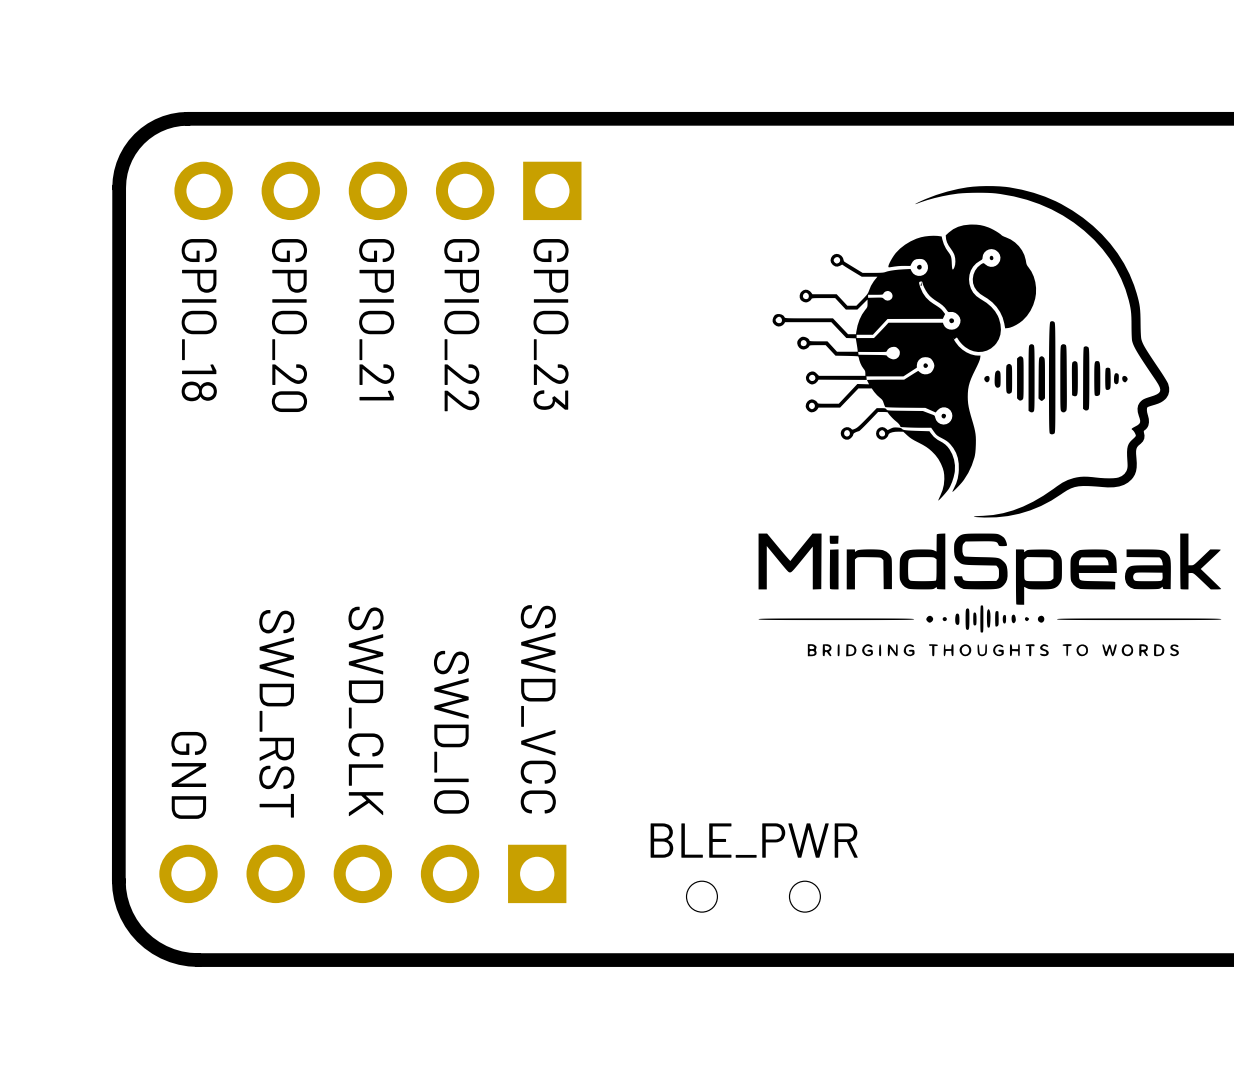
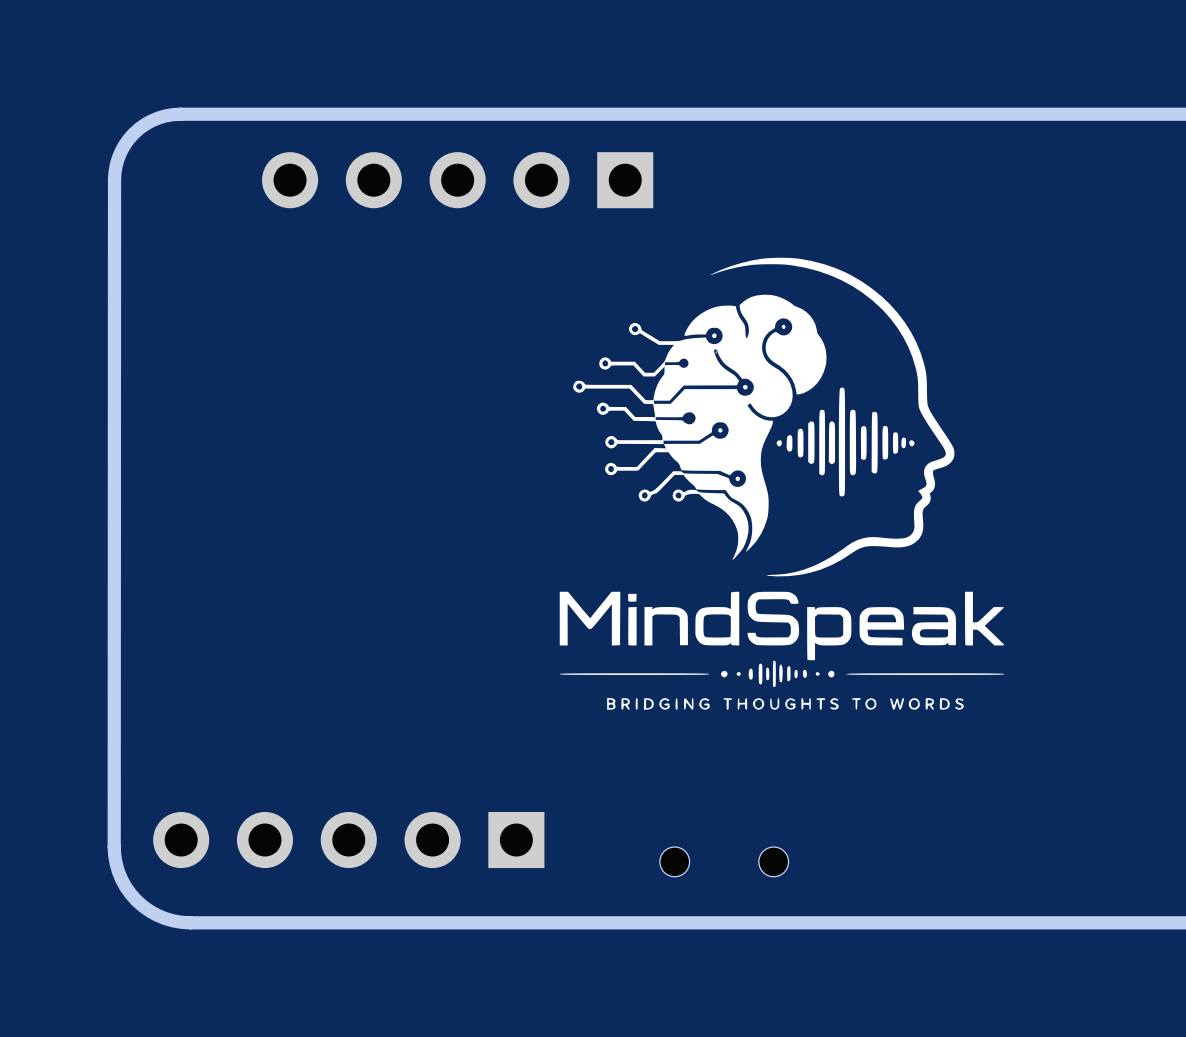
part position: (377, 190) -> (457, 180)
text: GPIO_21 (376, 319) -> none
text: GPIO_18 (199, 320) -> none
text: GPIO_23 (551, 324) -> none
text: GPIO_20 (289, 325) -> none
text: GPIO_22 (461, 325) -> none
drawing position: (989, 421) -> (782, 483)
text: SWD_VCC (538, 709) -> none
text: SWD_CLK (366, 711) -> none
text: SWD_RST (276, 713) -> none
text: SWD_IO (451, 732) -> none
text: GND (188, 775) -> none
text: BLE_PWR (754, 840) -> none

